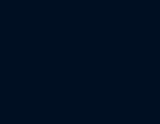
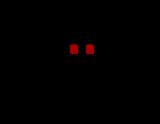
part: none -> (82, 49)

